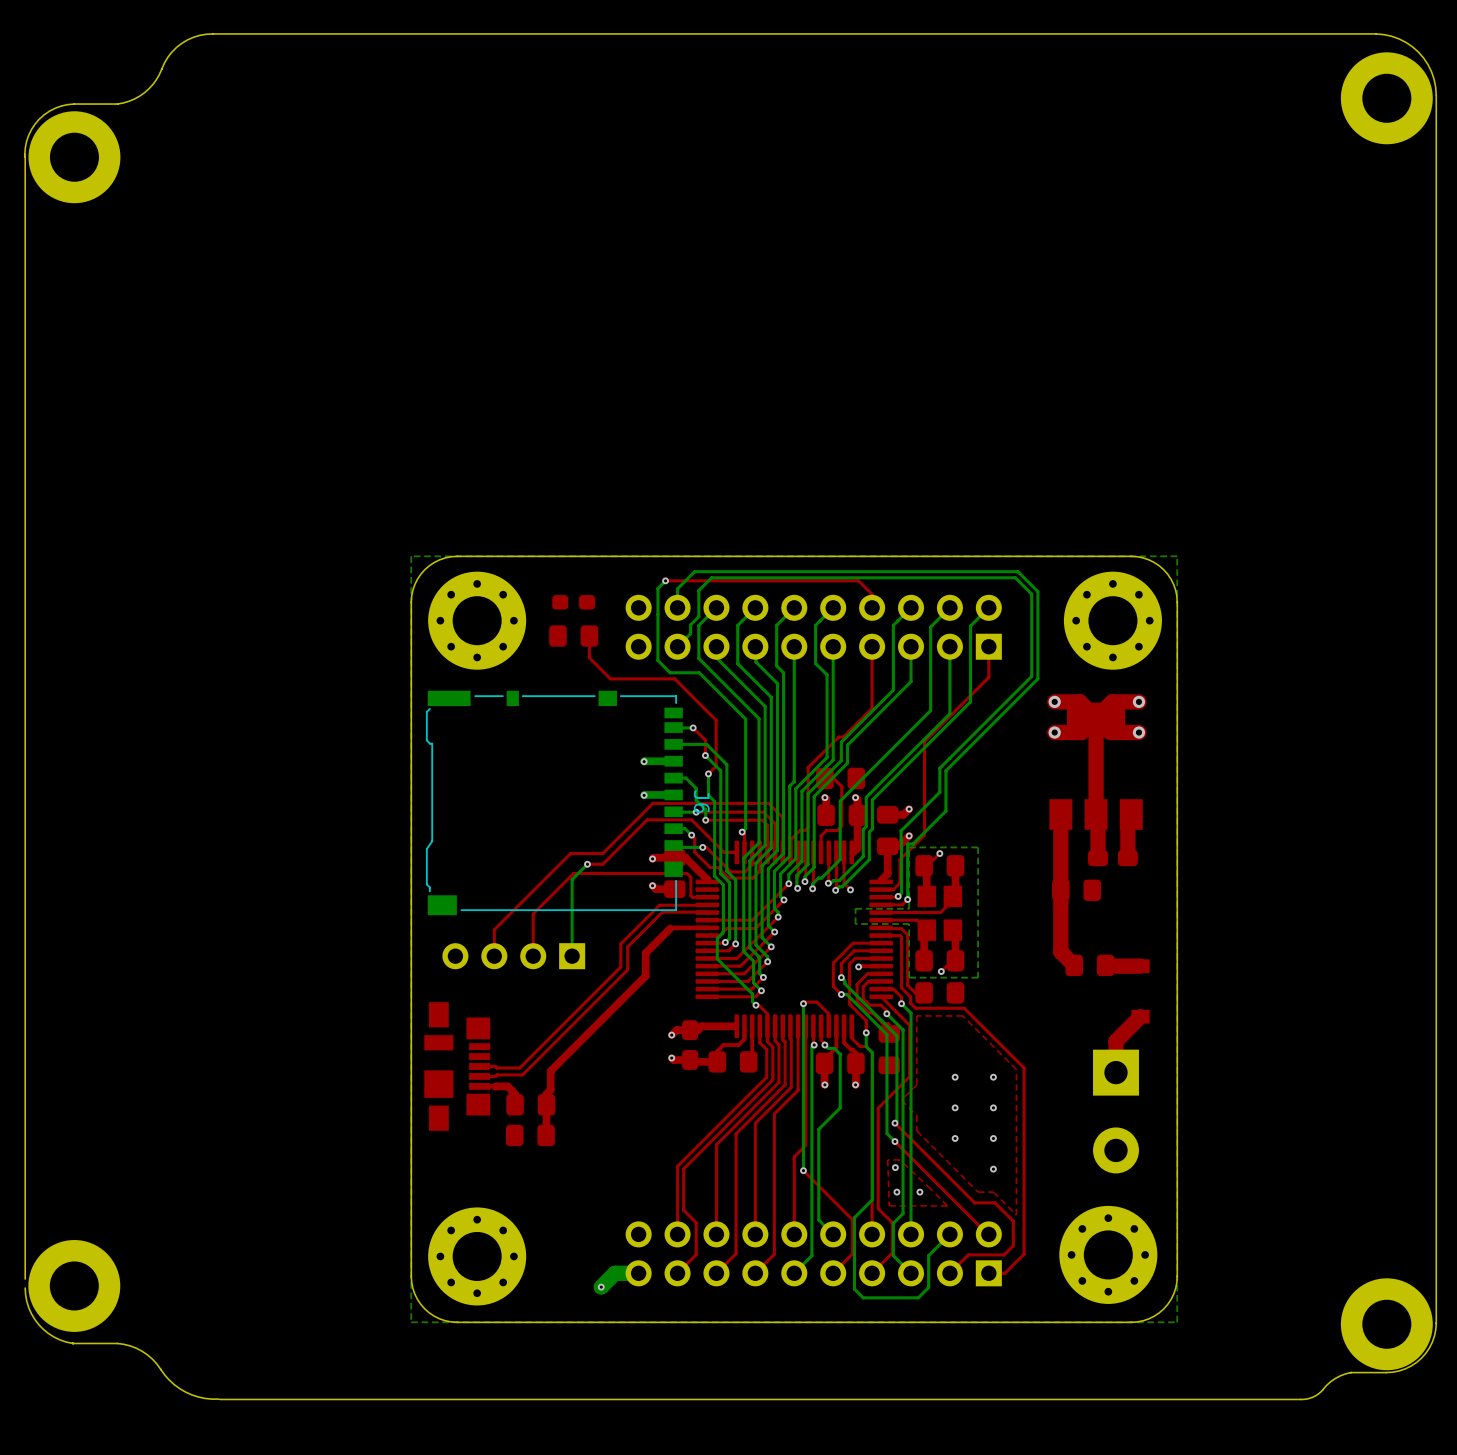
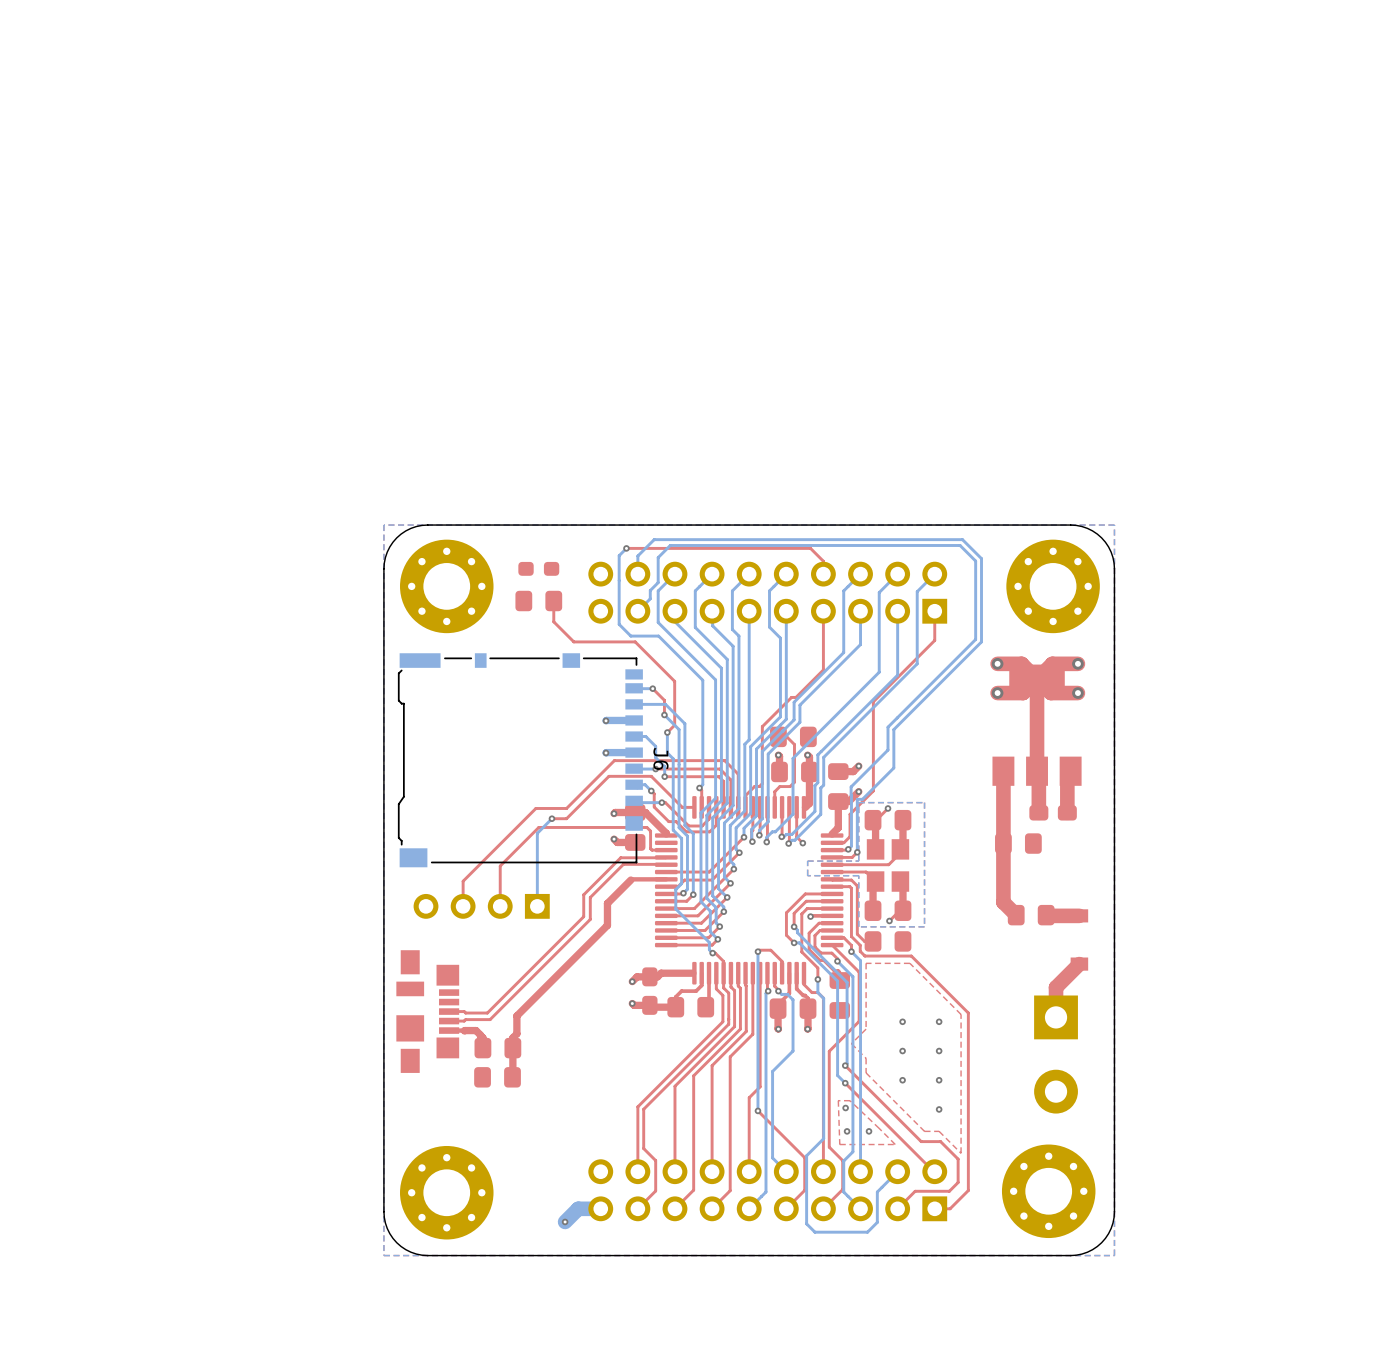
board edge: (1436, 94) (1431, 71) (1418, 52) (1399, 38) (1376, 33) (212, 33) (193, 37) (176, 47) (167, 57) (152, 84) (134, 98) (117, 104) (67, 104) (55, 108) (44, 114) (35, 124) (28, 135) (24, 154) (25, 1279) -> none
board edge: (1436, 95) (1436, 1323) (1434, 1336) (1429, 1348) (1421, 1358) (1411, 1366) (1392, 1372) (1350, 1372) -> none
part: (1386, 98) -> none
part: (74, 157) -> none
part: (74, 1285) -> none
board edge: (25, 1288) (28, 1307) (38, 1324) (54, 1337) (72, 1343) -> none
part: (1386, 1324) -> none
board edge: (73, 1343) (117, 1343) (136, 1348) (152, 1359) (169, 1380) (179, 1388) (198, 1397) (218, 1399) -> none
board edge: (1351, 1372) (1335, 1378) (1322, 1389) -> none
board edge: (1322, 1389) (1312, 1397) (1300, 1399) (219, 1399) -> none

